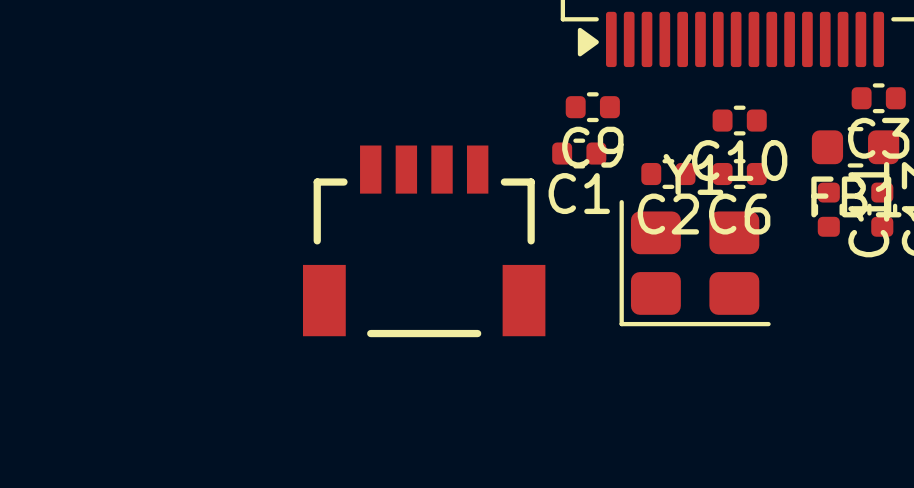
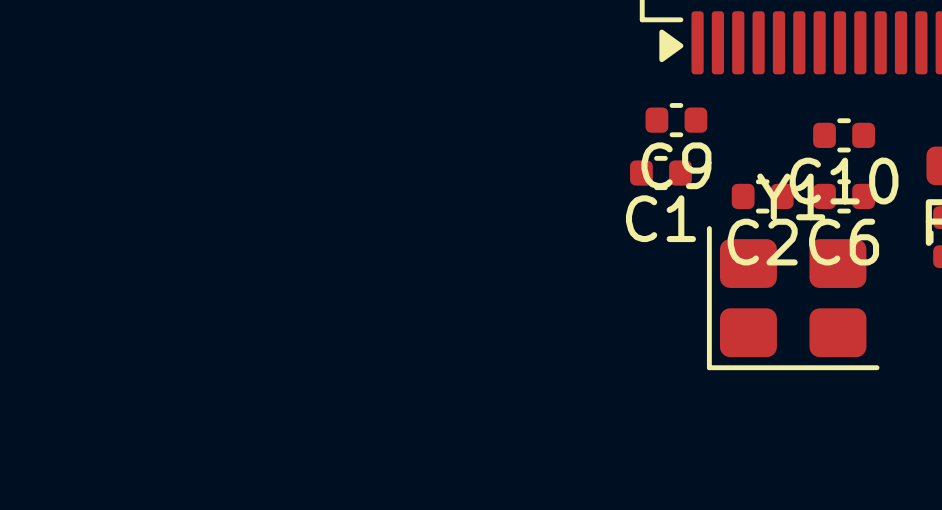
part: (424, 241) -> none

